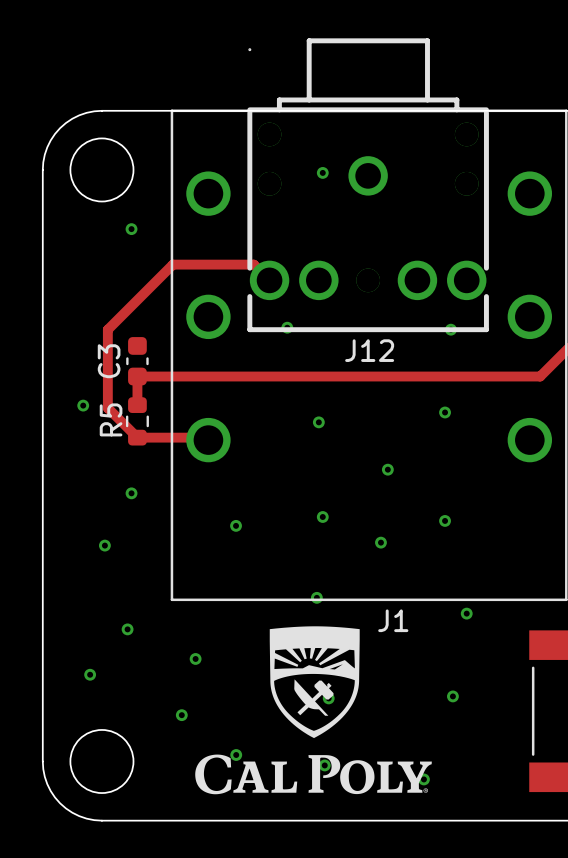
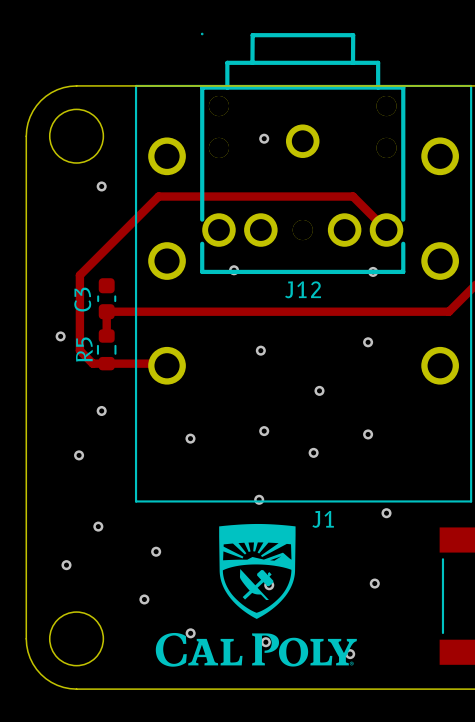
J12 footprint: [247, 38, 489, 333] -> [200, 32, 406, 275]
track: (269, 280) (253, 264) (172, 264) (107, 329) (107, 408) (137, 437) -> (386, 230) (353, 196) (158, 196) (79, 275) (79, 350) (92, 363) (106, 363)

